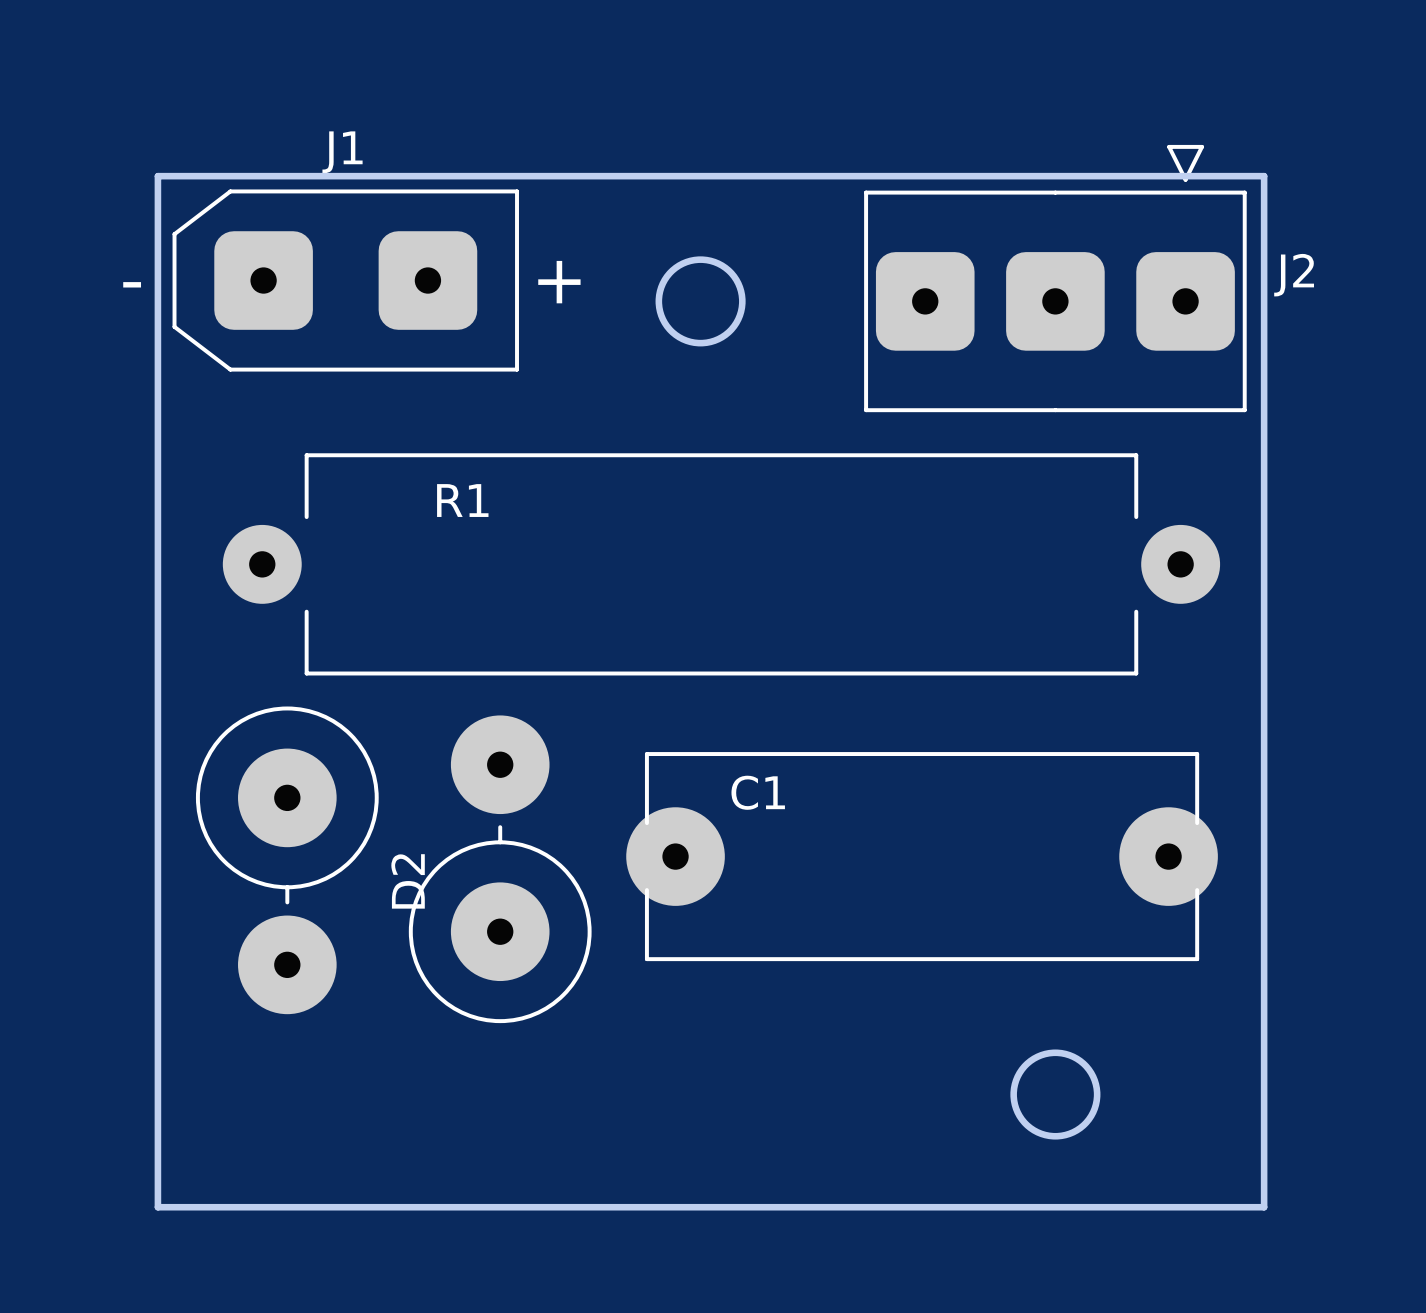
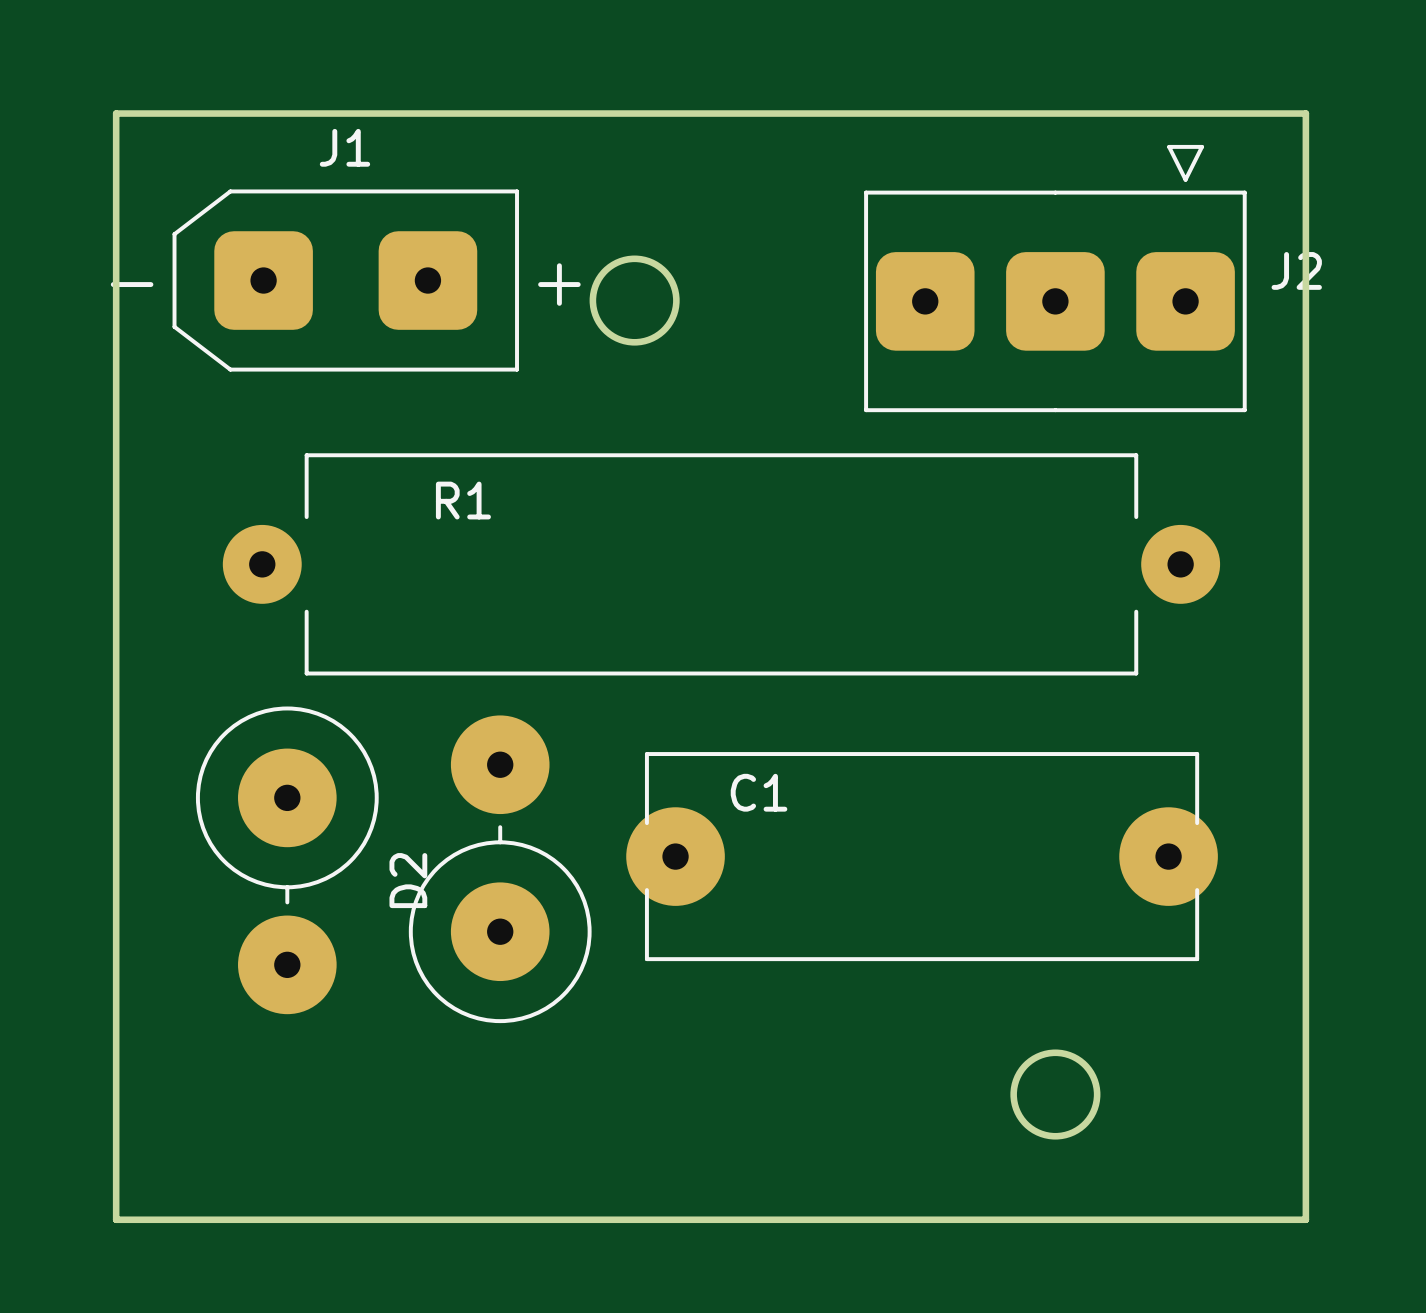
board edge: (157, 176) (1264, 176) (1264, 1207) (157, 1207) (157, 176) -> (116, 113) (116, 1219) (1305, 1219) (1305, 113) (116, 113)
round board edge position: (700, 301) -> (634, 300)

